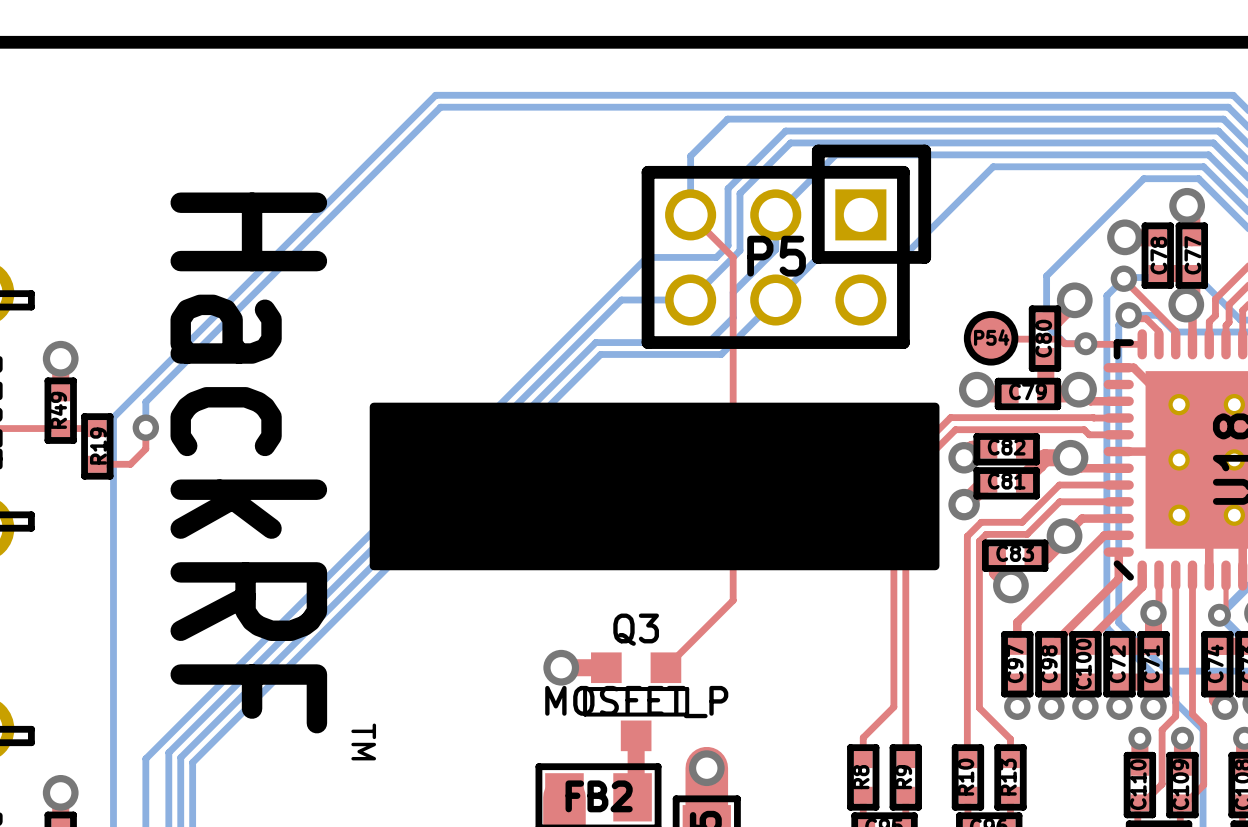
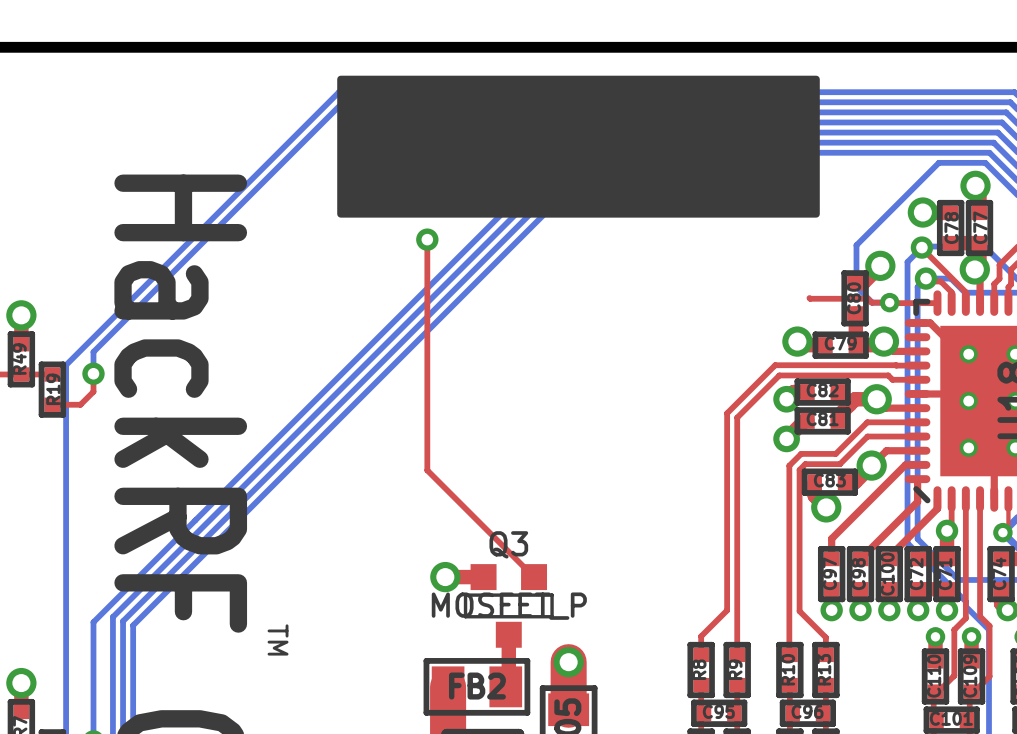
bottom track: (785, 131) (728, 188) (728, 245) (716, 257) (647, 257) (145, 758) -> (635, 122) (593, 122) (93, 622) (93, 654)
bottom track: (790, 142) (739, 193) (739, 250) (690, 300) (621, 300) (168, 752) -> (639, 132) (597, 132) (112, 617) (112, 649)
bottom track: (835, 154) (775, 214) (775, 249) (733, 292) (733, 317) (708, 342) (595, 342) (180, 757) -> (677, 142) (601, 142) (123, 621) (123, 653)
bottom track: (993, 166) (902, 257) (818, 257) (721, 354) (600, 354) (192, 762) -> (811, 152) (605, 152) (133, 625) (133, 657)
top track: (690, 214) (733, 257) (733, 600) (665, 667) -> (427, 239) (427, 470) (534, 577)
P5: (786, 246) -> none
via: none -> (427, 239)
P54: (991, 338) -> none
drawing position: (654, 486) -> (578, 146)

